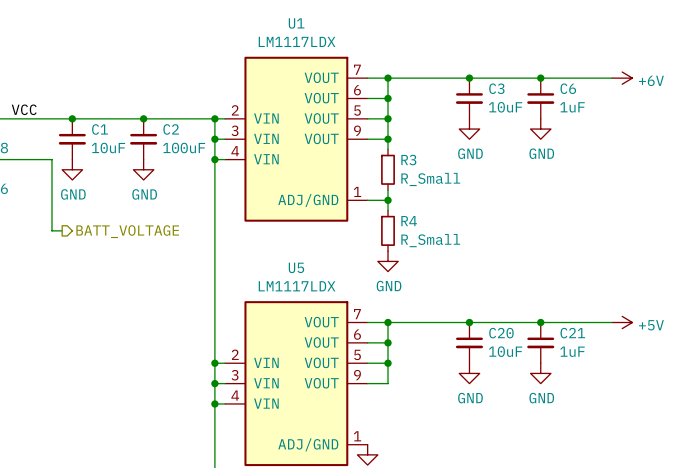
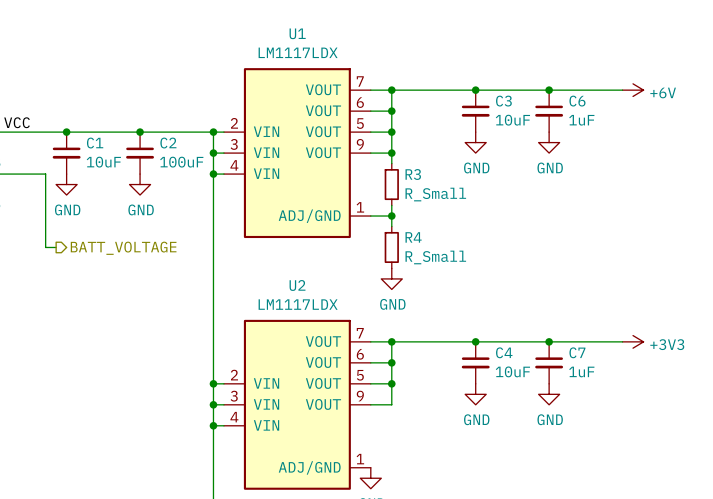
U5 name: U5 (296, 267) -> U2 (297, 285)
power symbol: +5V (622, 322) -> +3V3 (633, 341)
C20 name: C20 (501, 333) -> C4 (504, 352)
C21 name: C21 (572, 333) -> C7 (577, 352)

